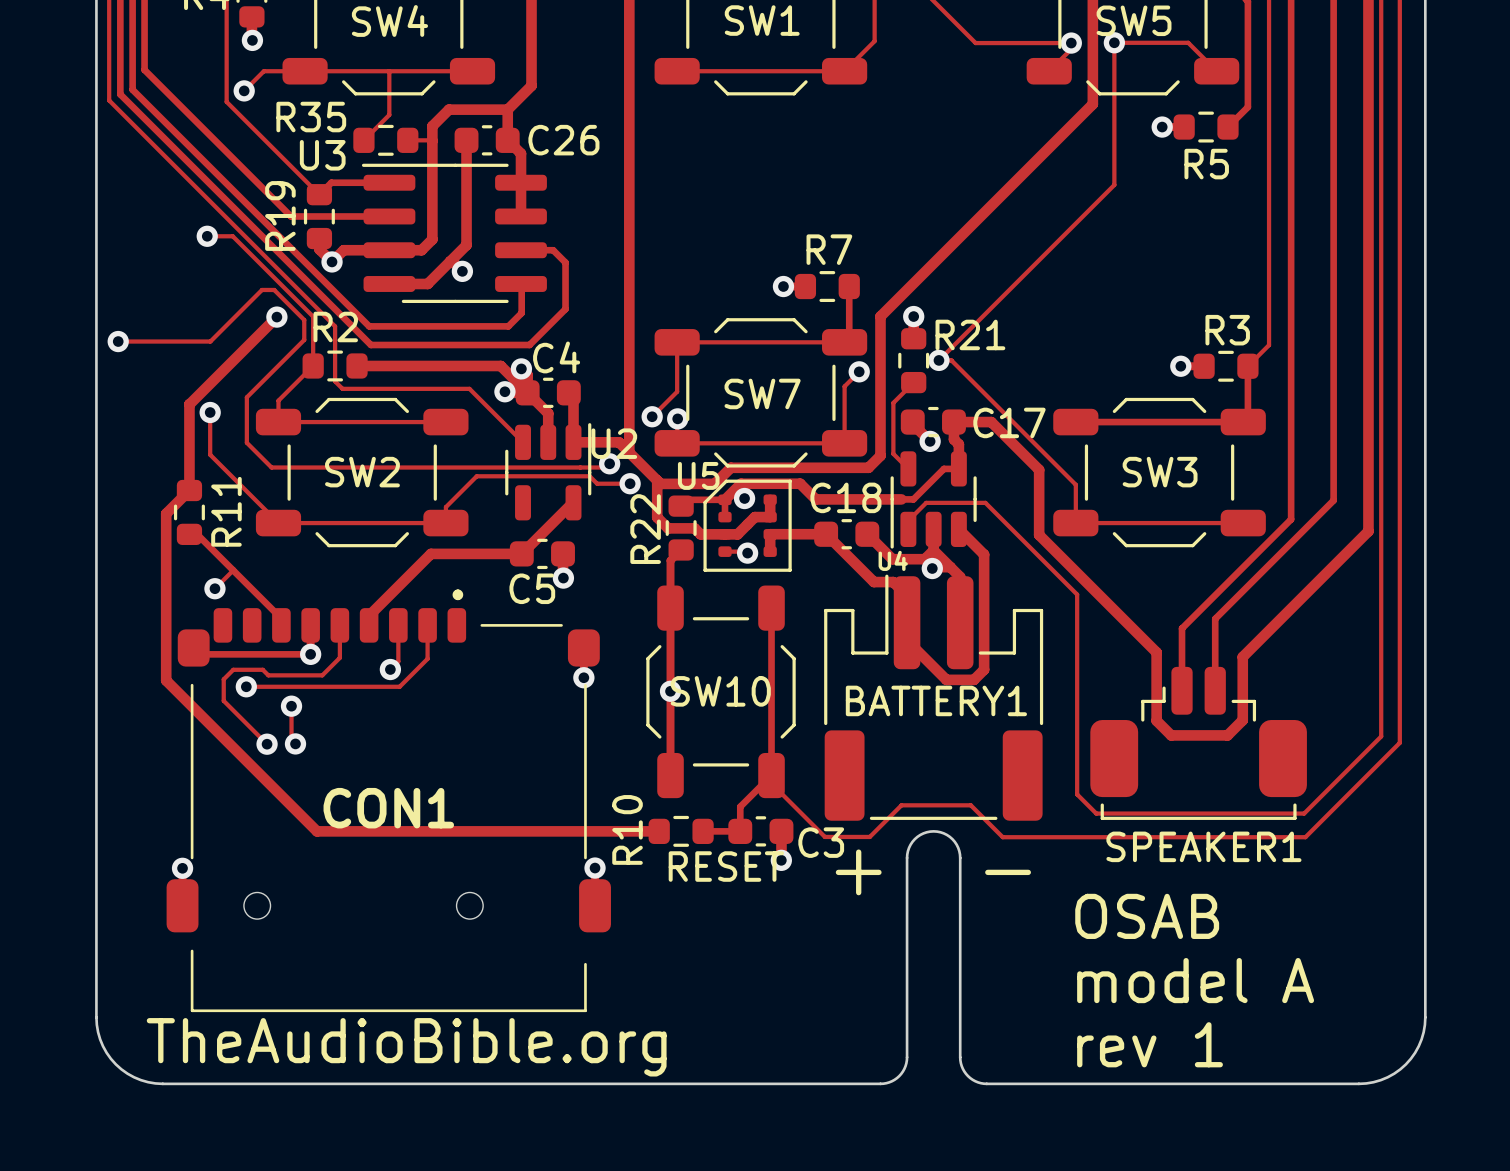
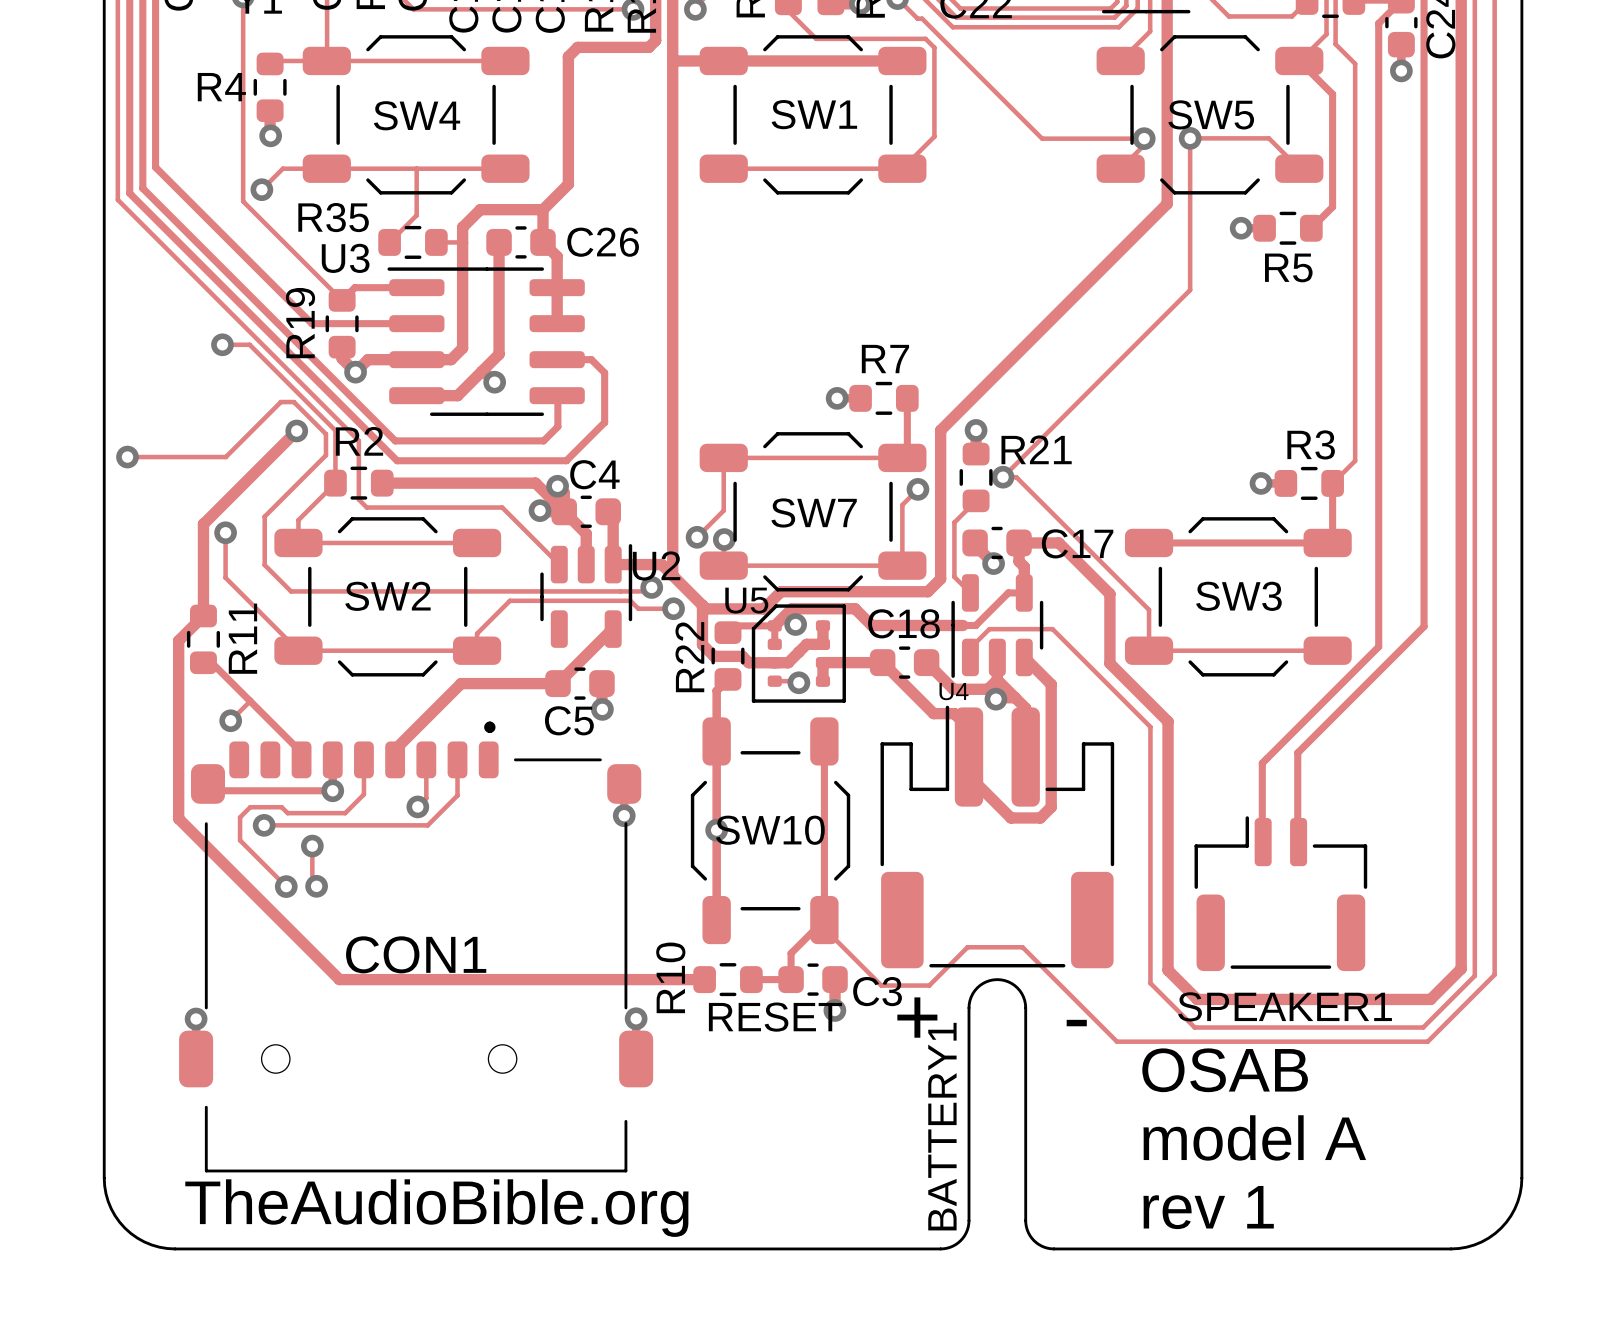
track: (1368, 531) (1242, 657) (1242, 720) (1227, 735) (1171, 735) (1156, 720) (1156, 652) (1093, 589) -> (1461, 659) (1461, 968) (1430, 999) (1197, 999) (1168, 970) (1168, 721)
SPEAKER1 footprint: [1090, 666, 1307, 820] -> [1194, 816, 1368, 972]
BATTERY1 name rotation: 0° (936, 700) -> 90° counterclockwise (942, 1126)
BATTERY1 name position: BATTERY1 (936, 700) -> BATTERY1 (942, 1126)
track: (1381, 736) (1304, 813) (1096, 813) (1077, 794) -> (1474, 878) (1474, 975) (1423, 1027) (1194, 1027) (1150, 983) (1150, 940)
track: (1399, 742) (1305, 837) (1002, 837) (970, 805) (901, 805) -> (1494, 885) (1494, 974) (1427, 1041) (1117, 1041) (1022, 947) (967, 947) (963, 951)

